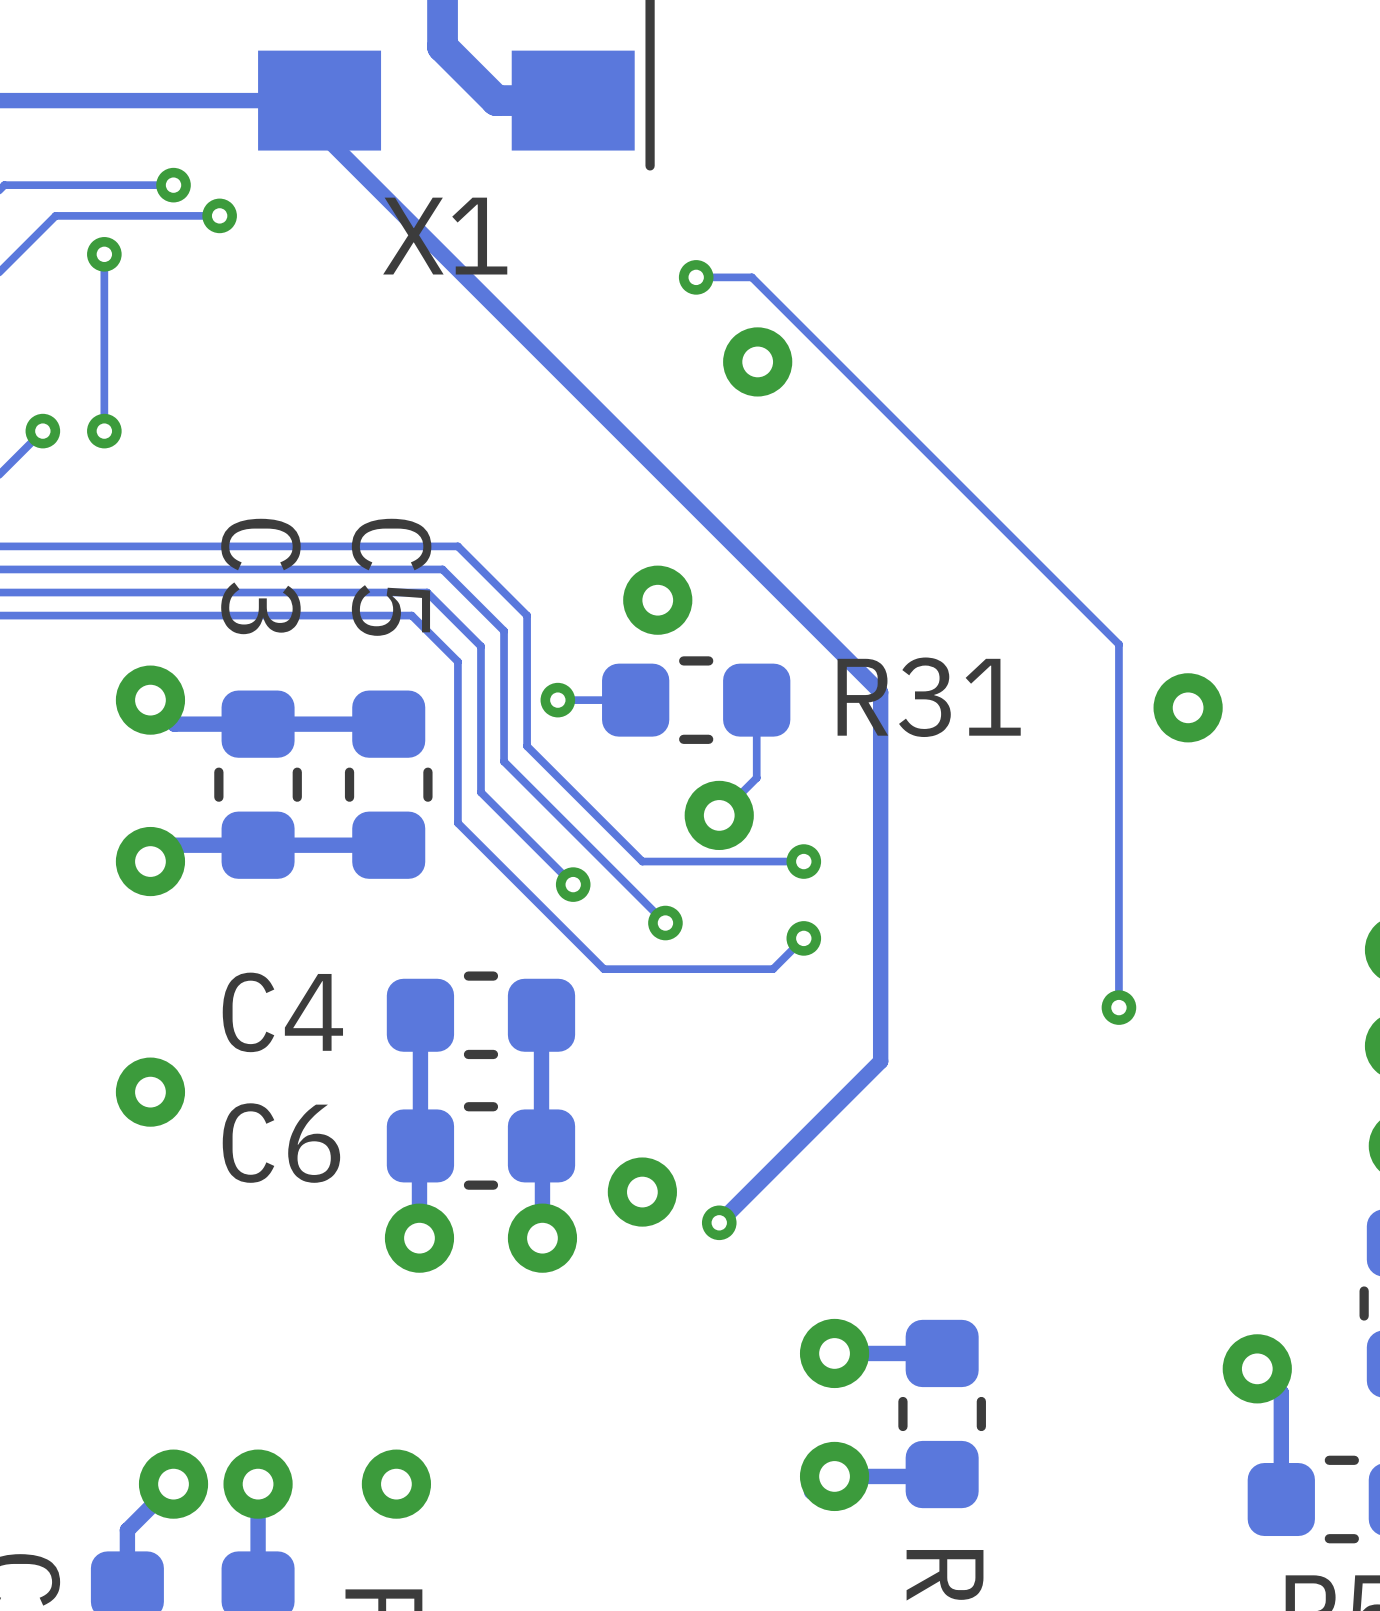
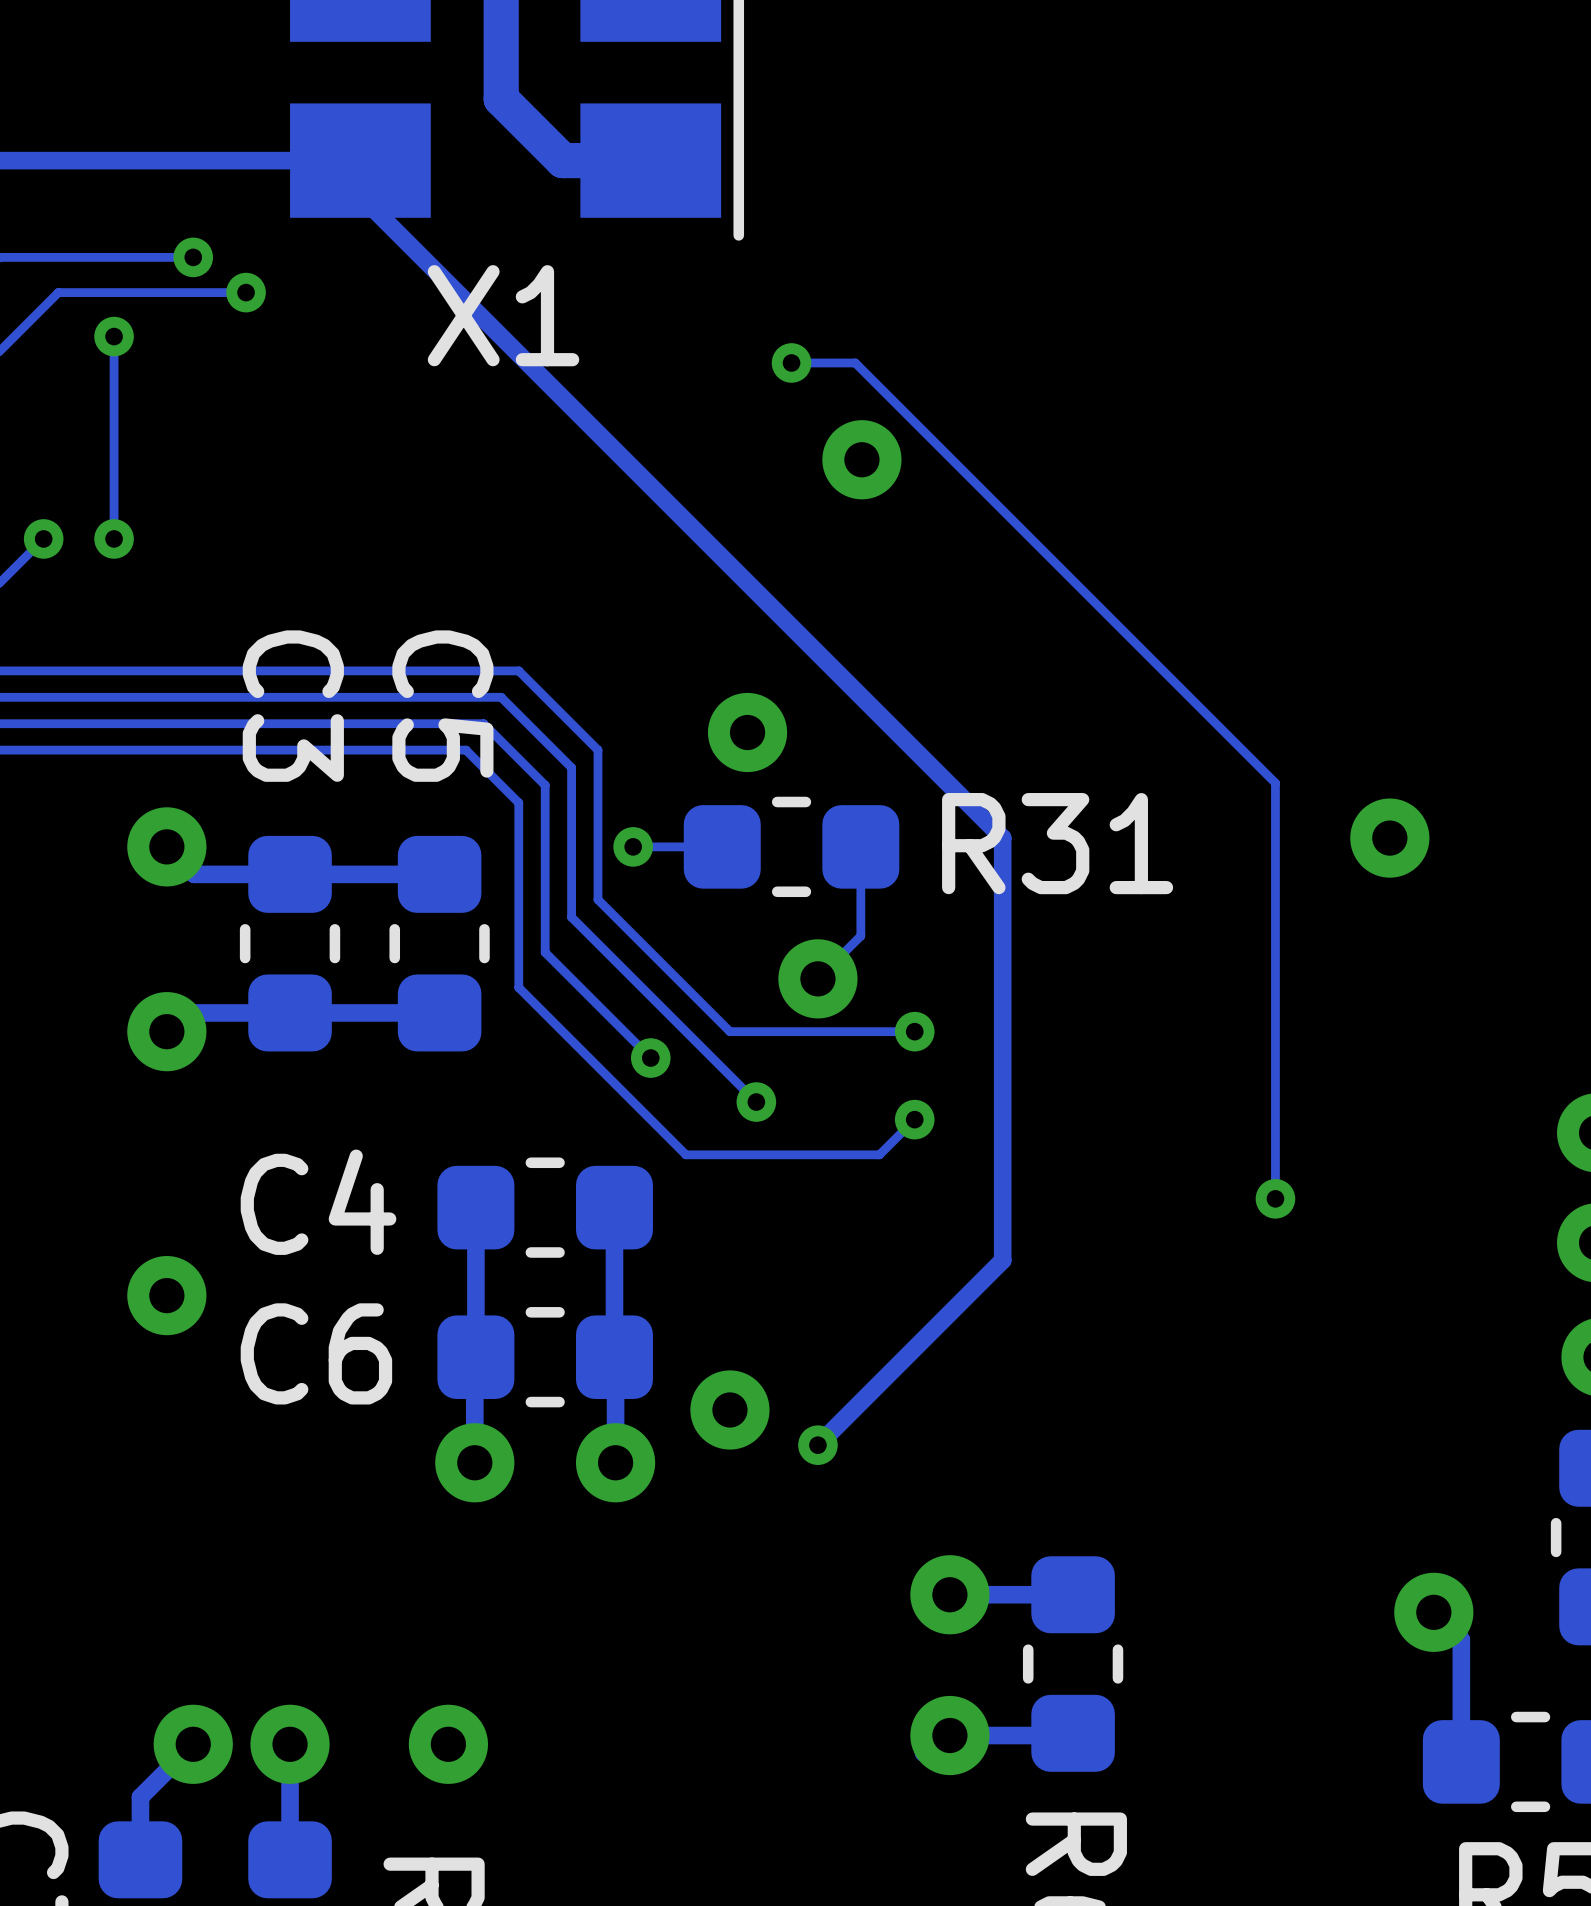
via position: (1188, 707) -> (1389, 838)

